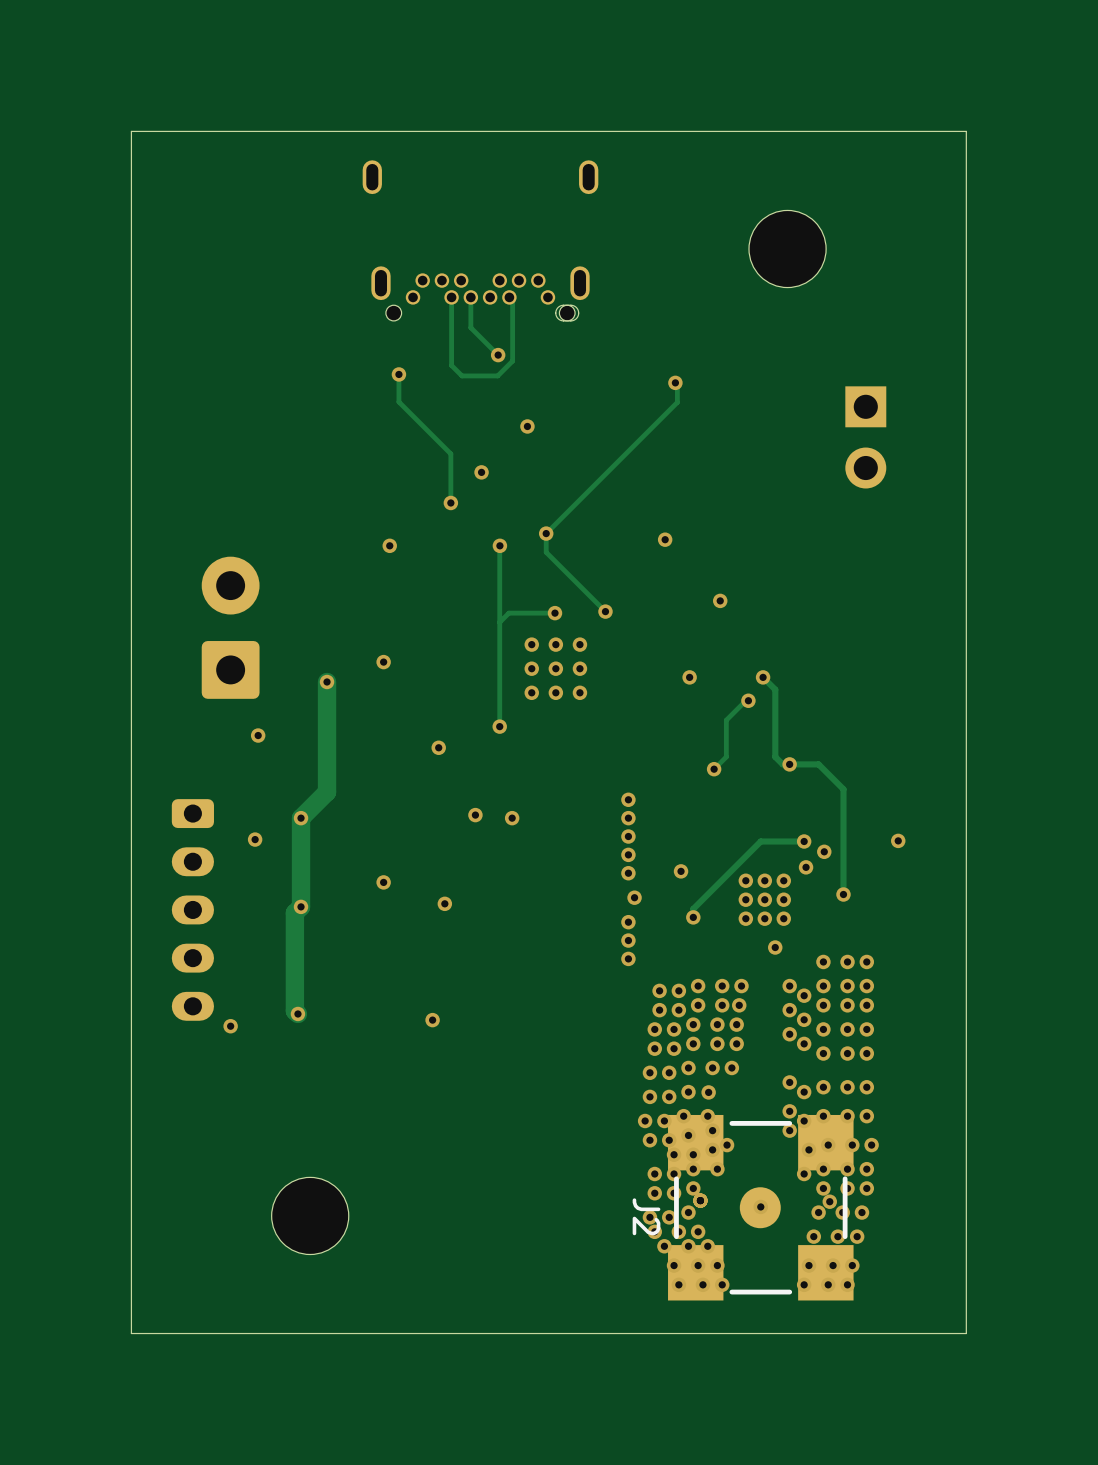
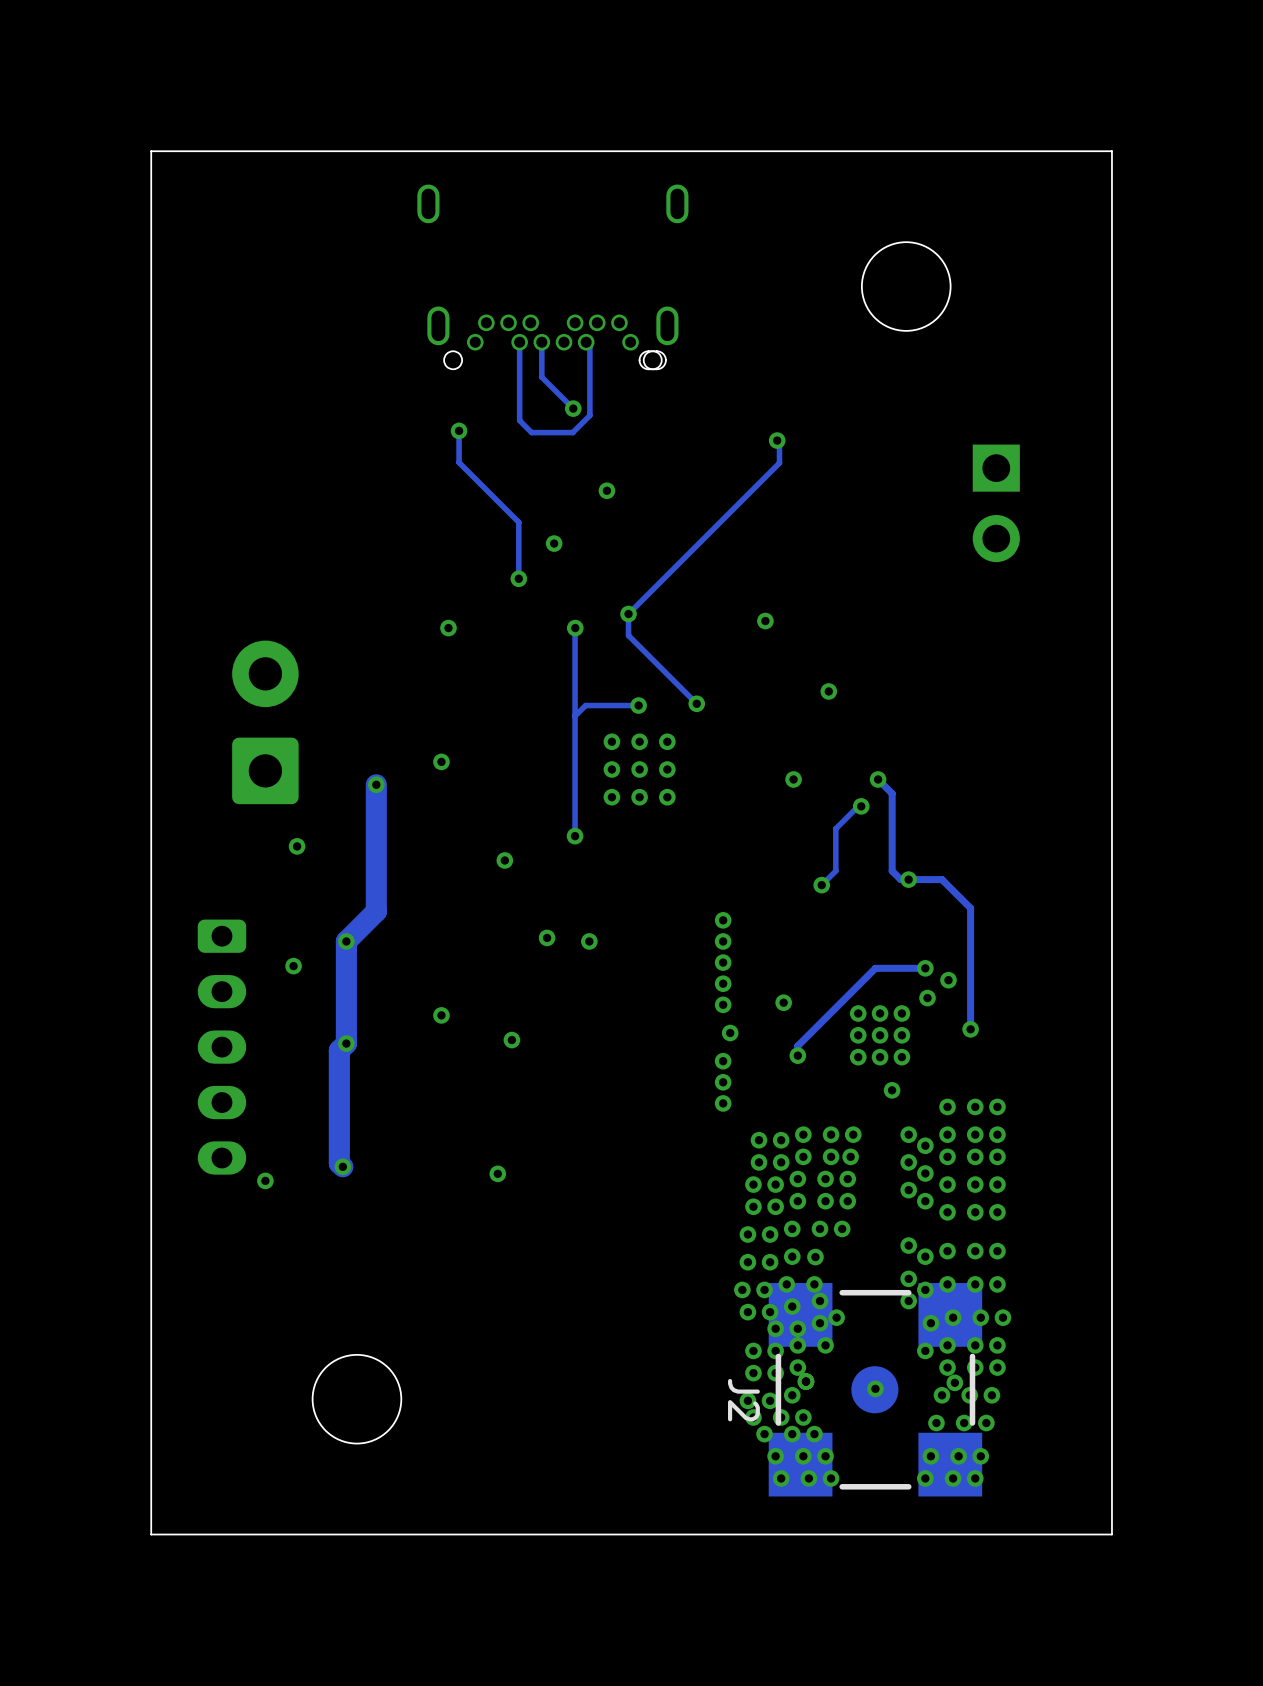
via: (898, 840) -> none

